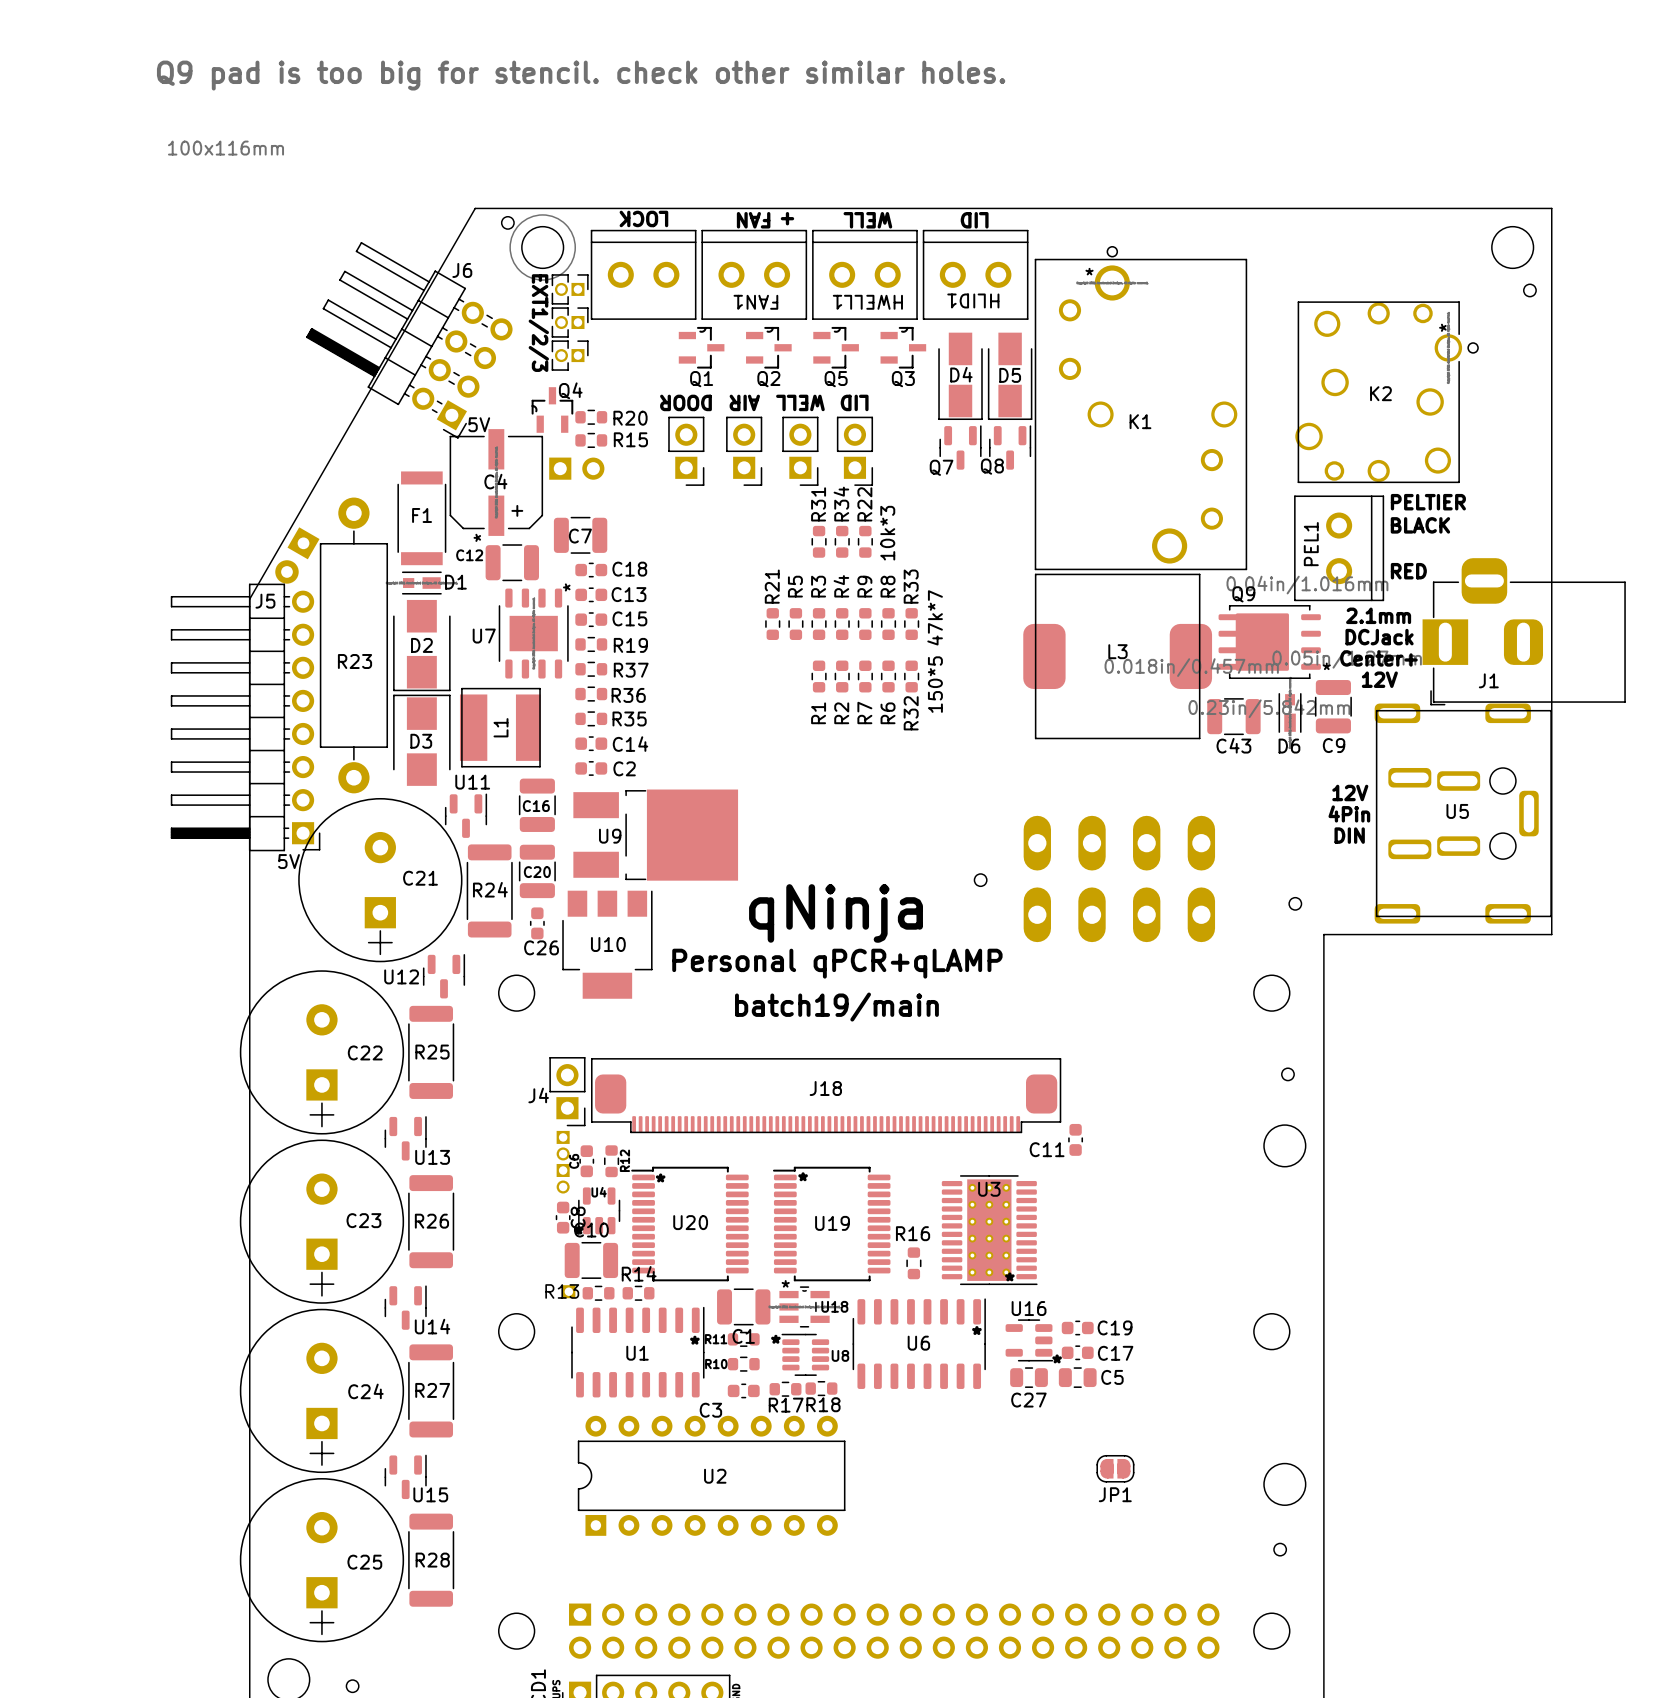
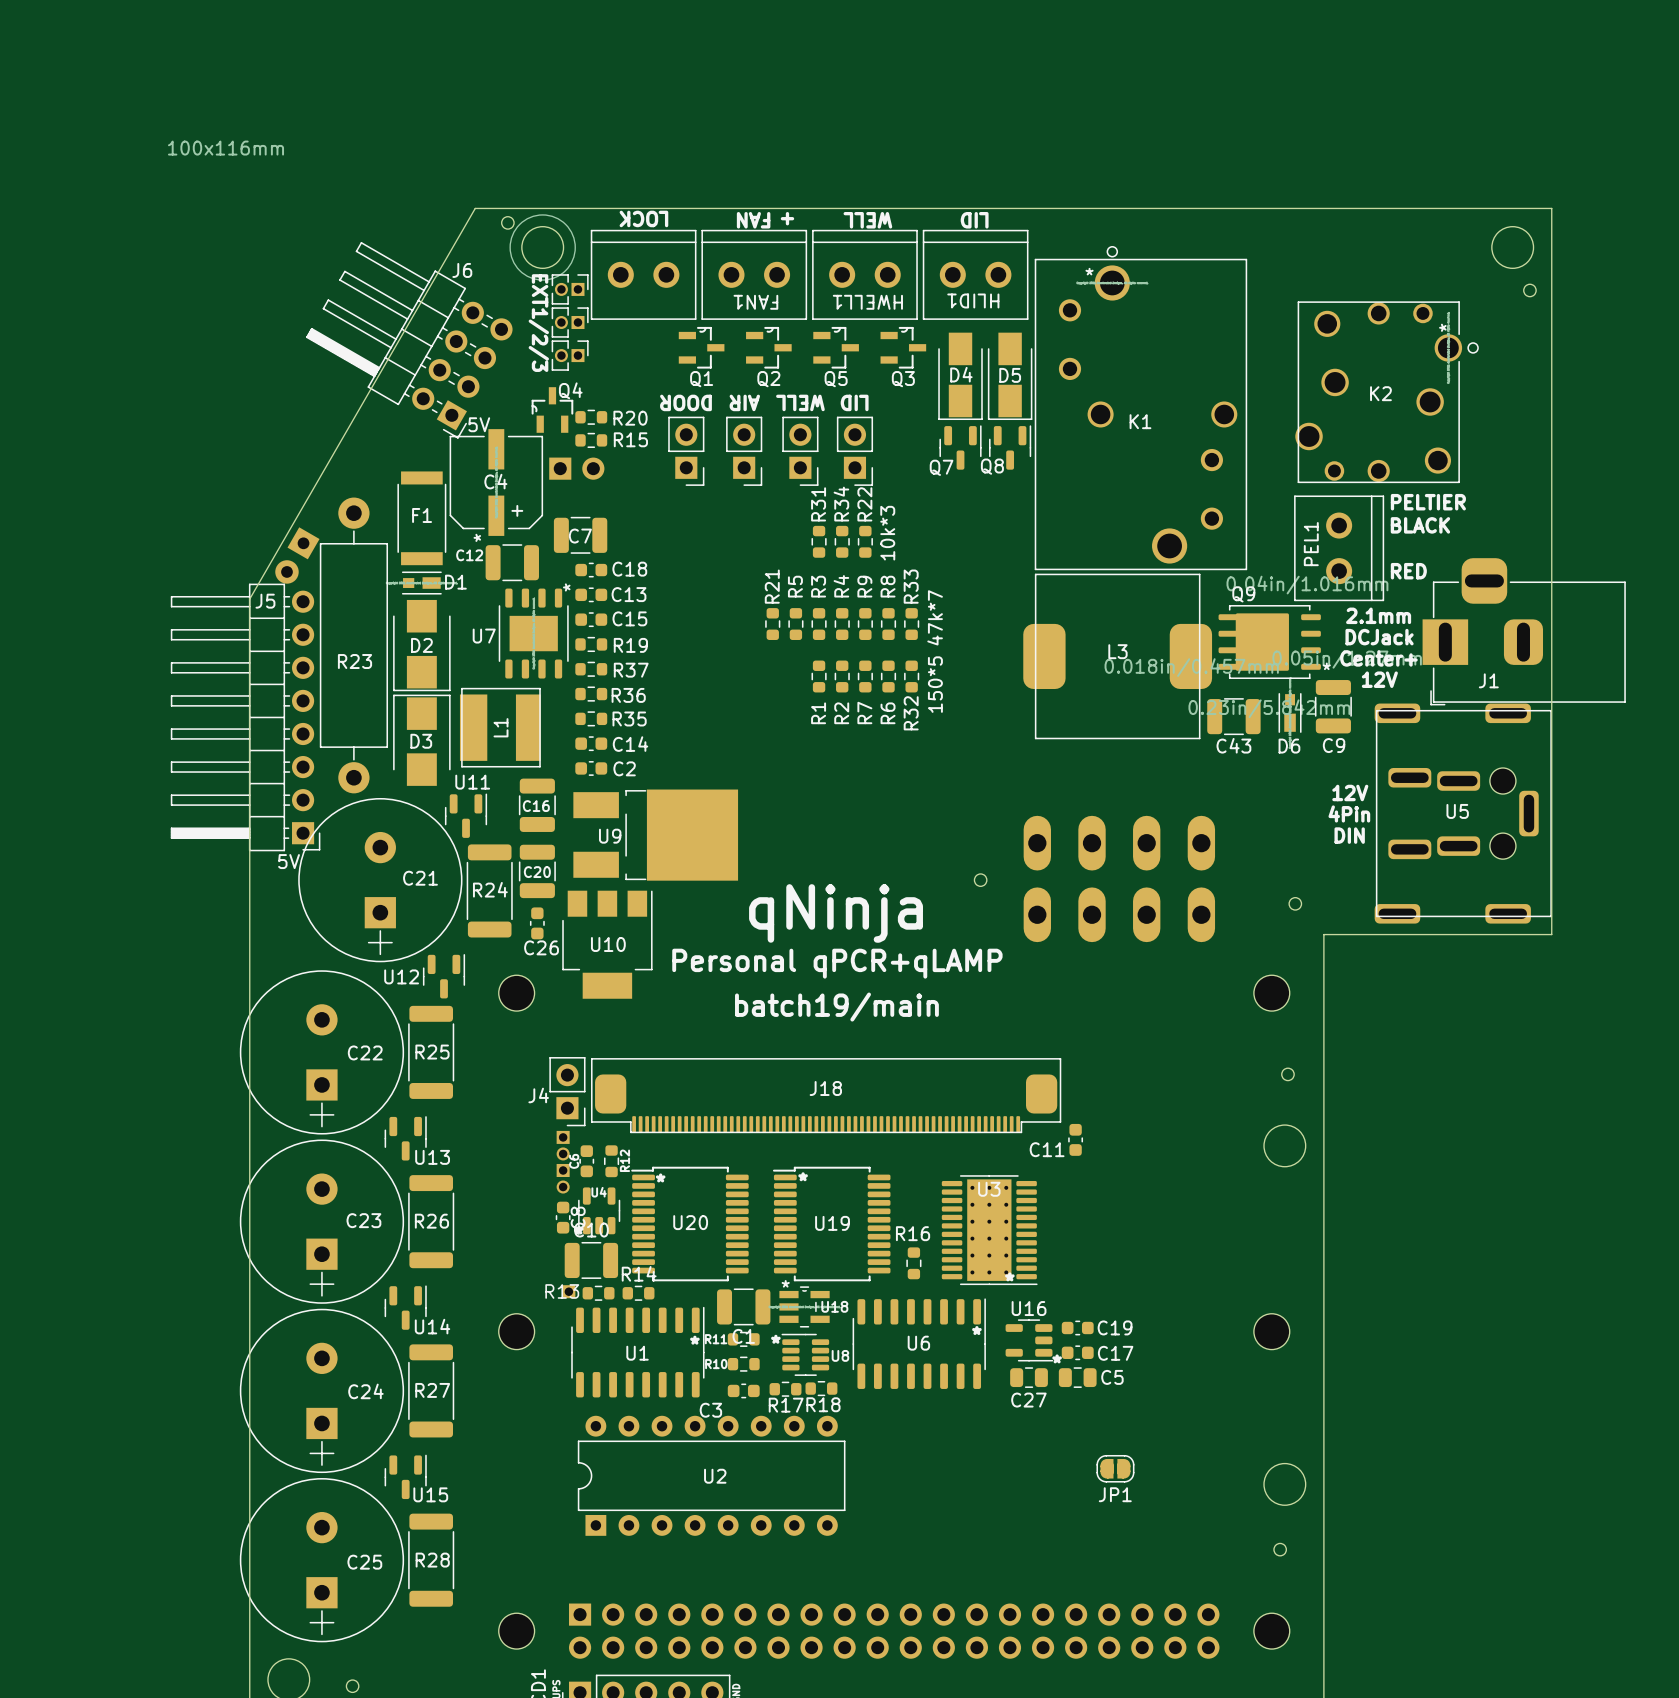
text: Q9 pad is too big for stencil. check other similar holes. (581, 75) -> none

